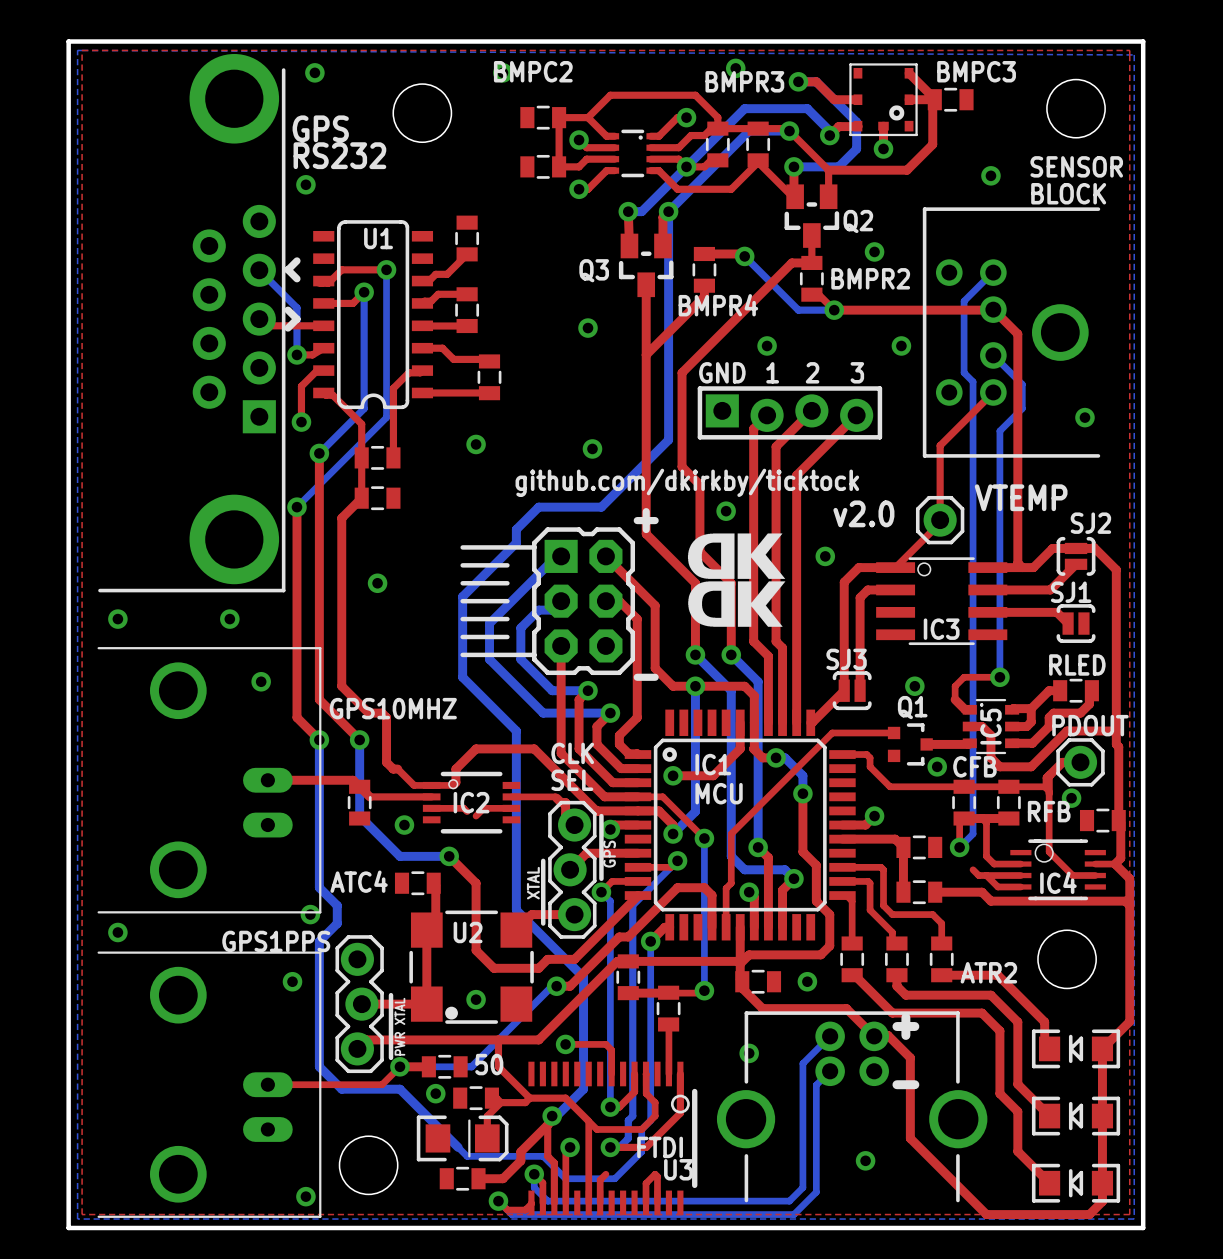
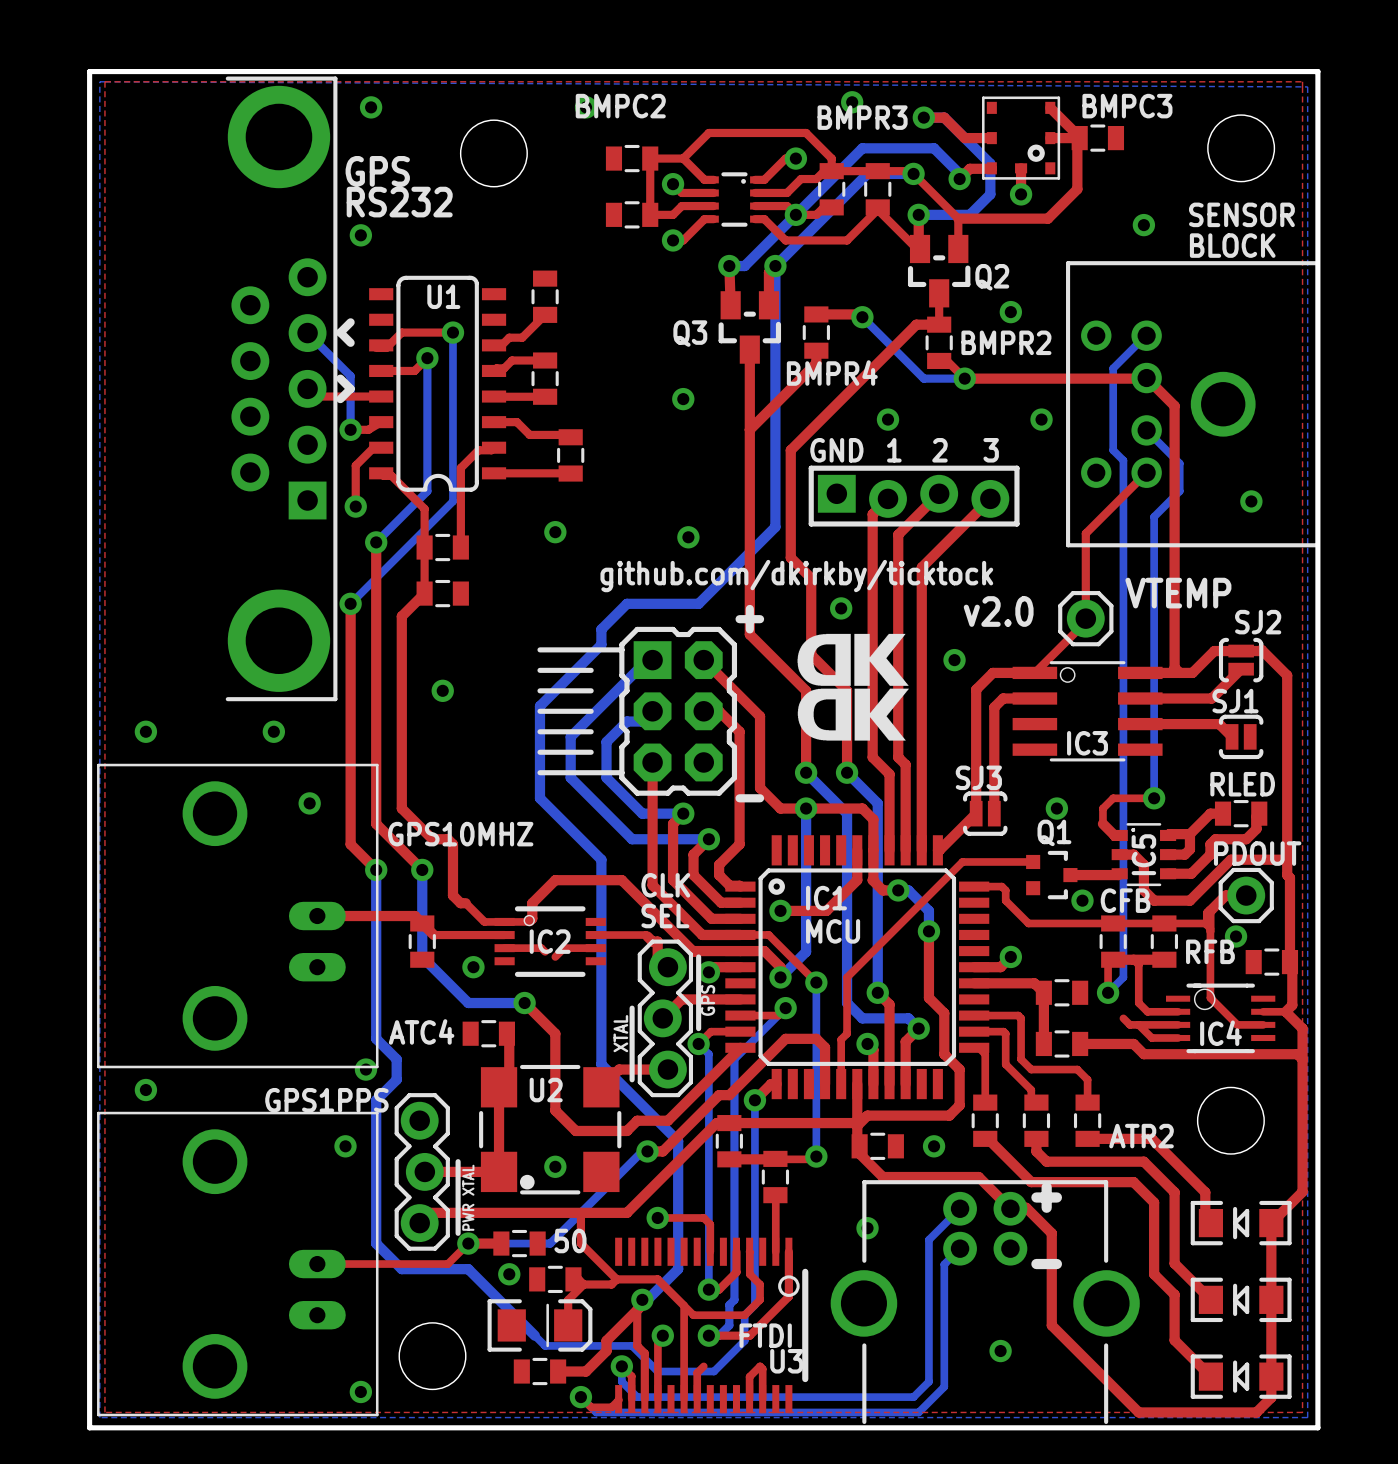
part: none -> (281, 388)
part: (191, 323) -> none
part: (1011, 332) -> none
part: none -> (1192, 404)
GPS10MHZ footprint: [97, 647, 322, 914] -> [97, 763, 379, 1069]
GPS1PPS footprint: [97, 951, 322, 1218] -> [97, 1111, 379, 1417]
part footprint: [716, 1011, 988, 1203] -> [830, 1180, 1140, 1425]

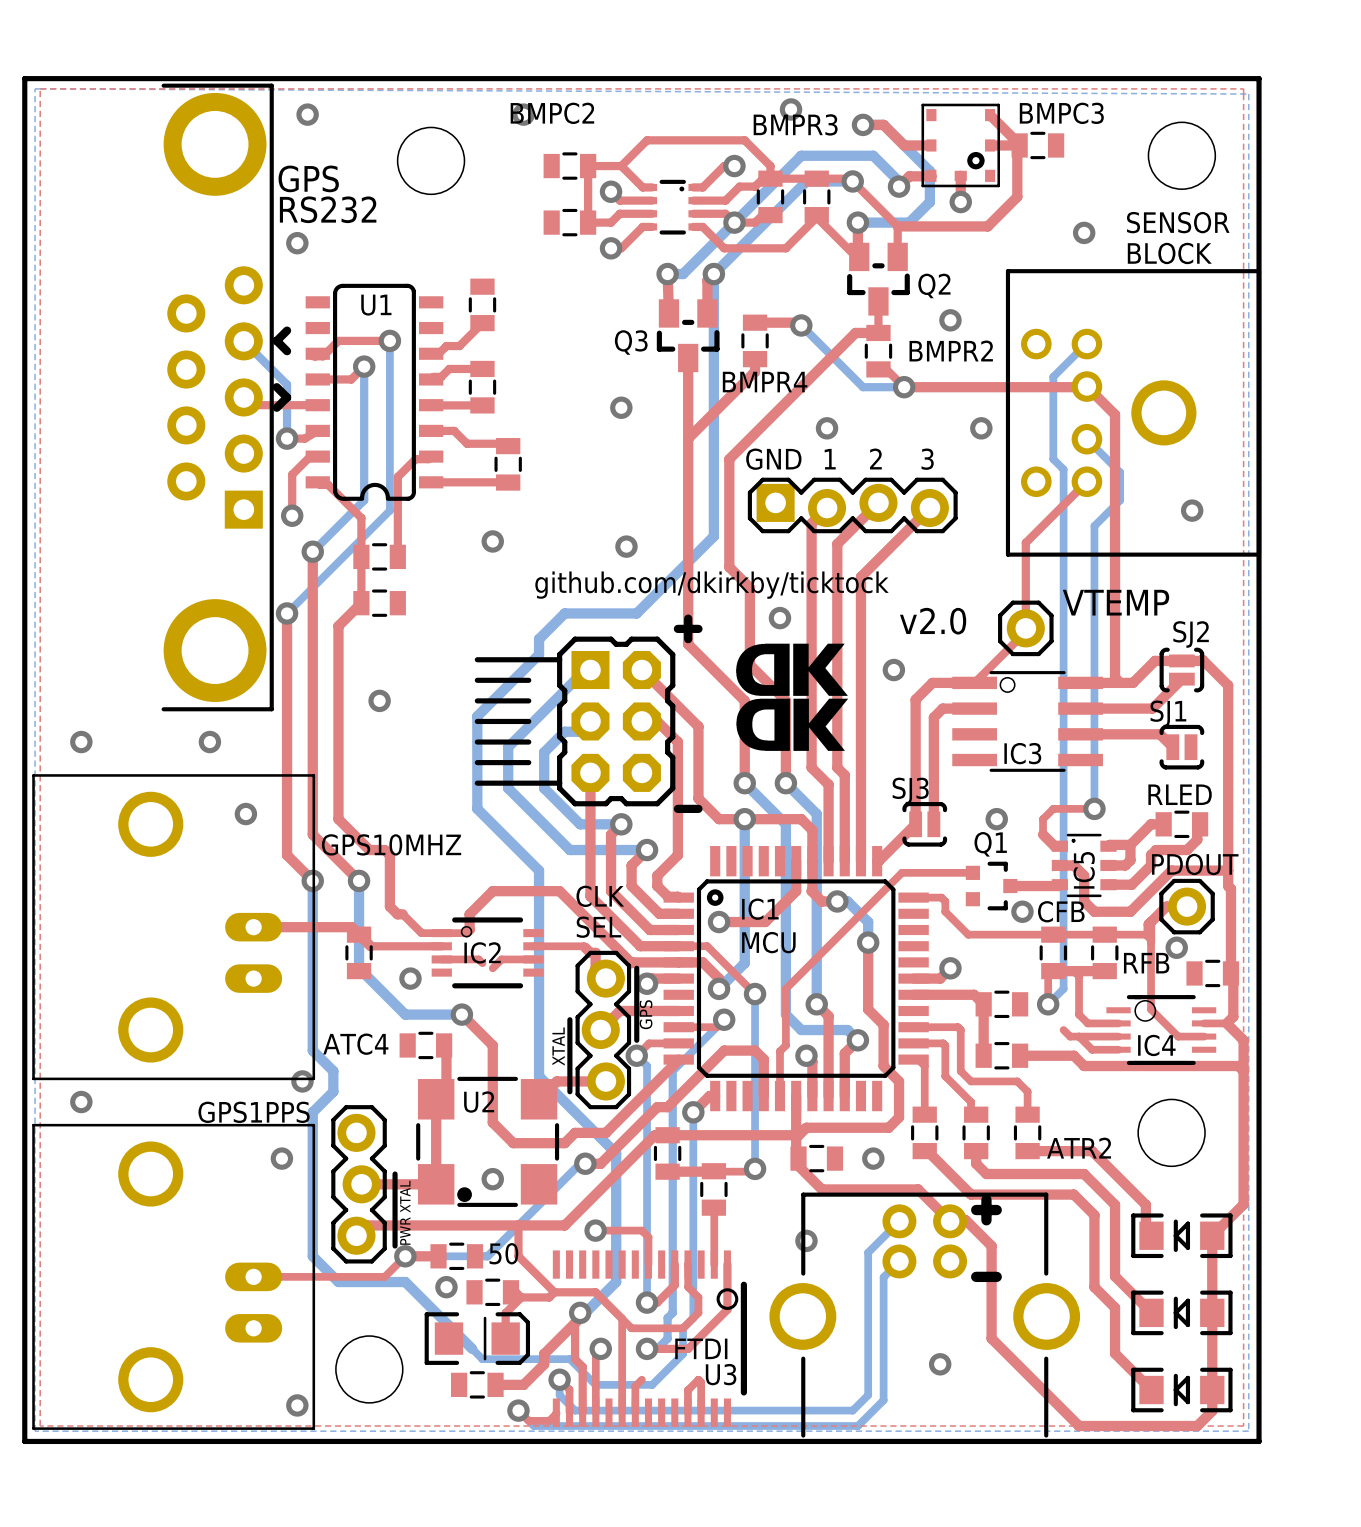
line: (811, 468) (811, 523) (1016, 523) (1016, 468) (811, 468) -> none
part footprint: [817, 474, 1010, 518] -> [747, 477, 958, 534]

